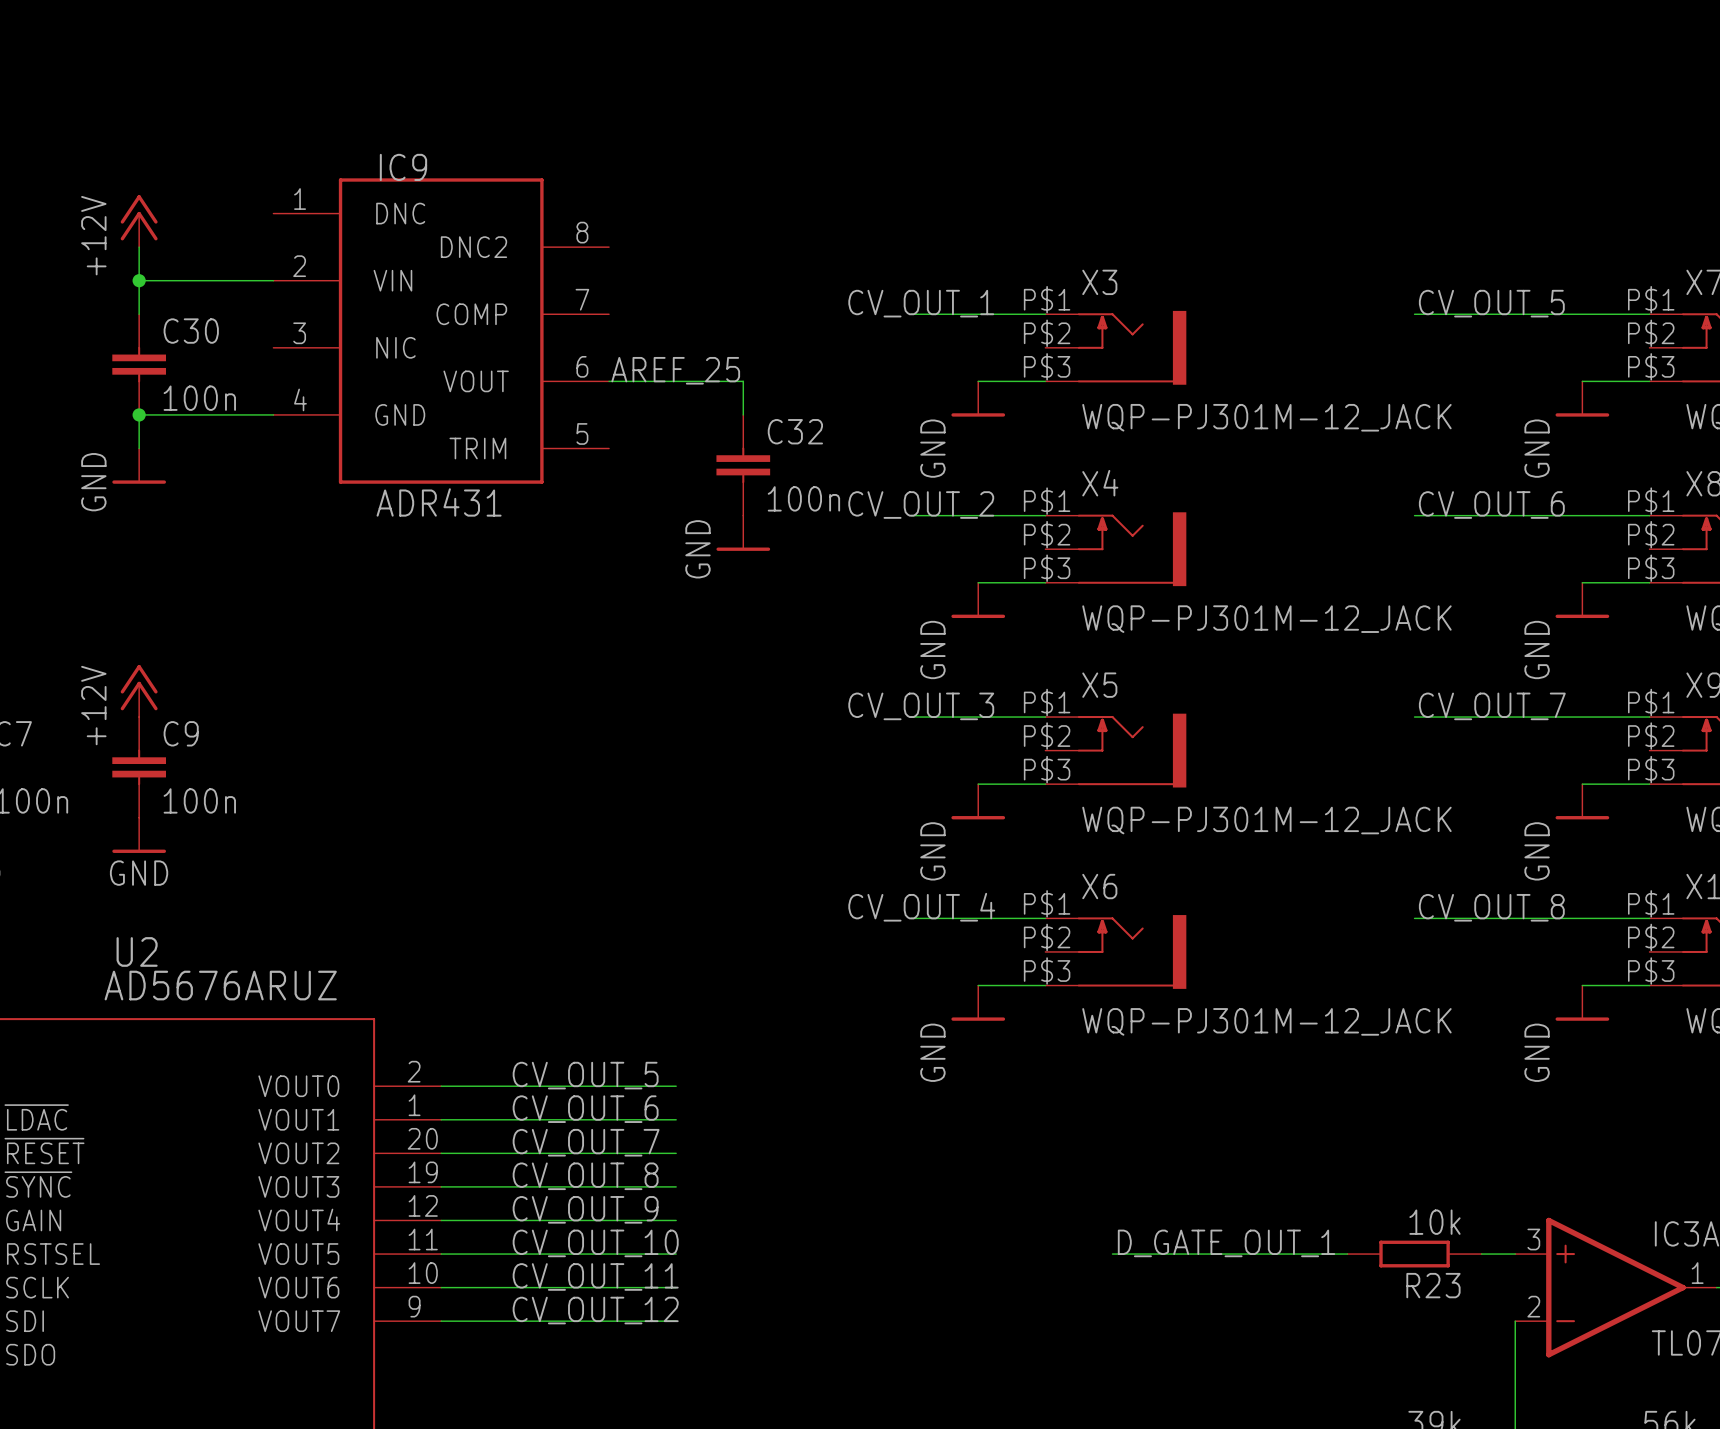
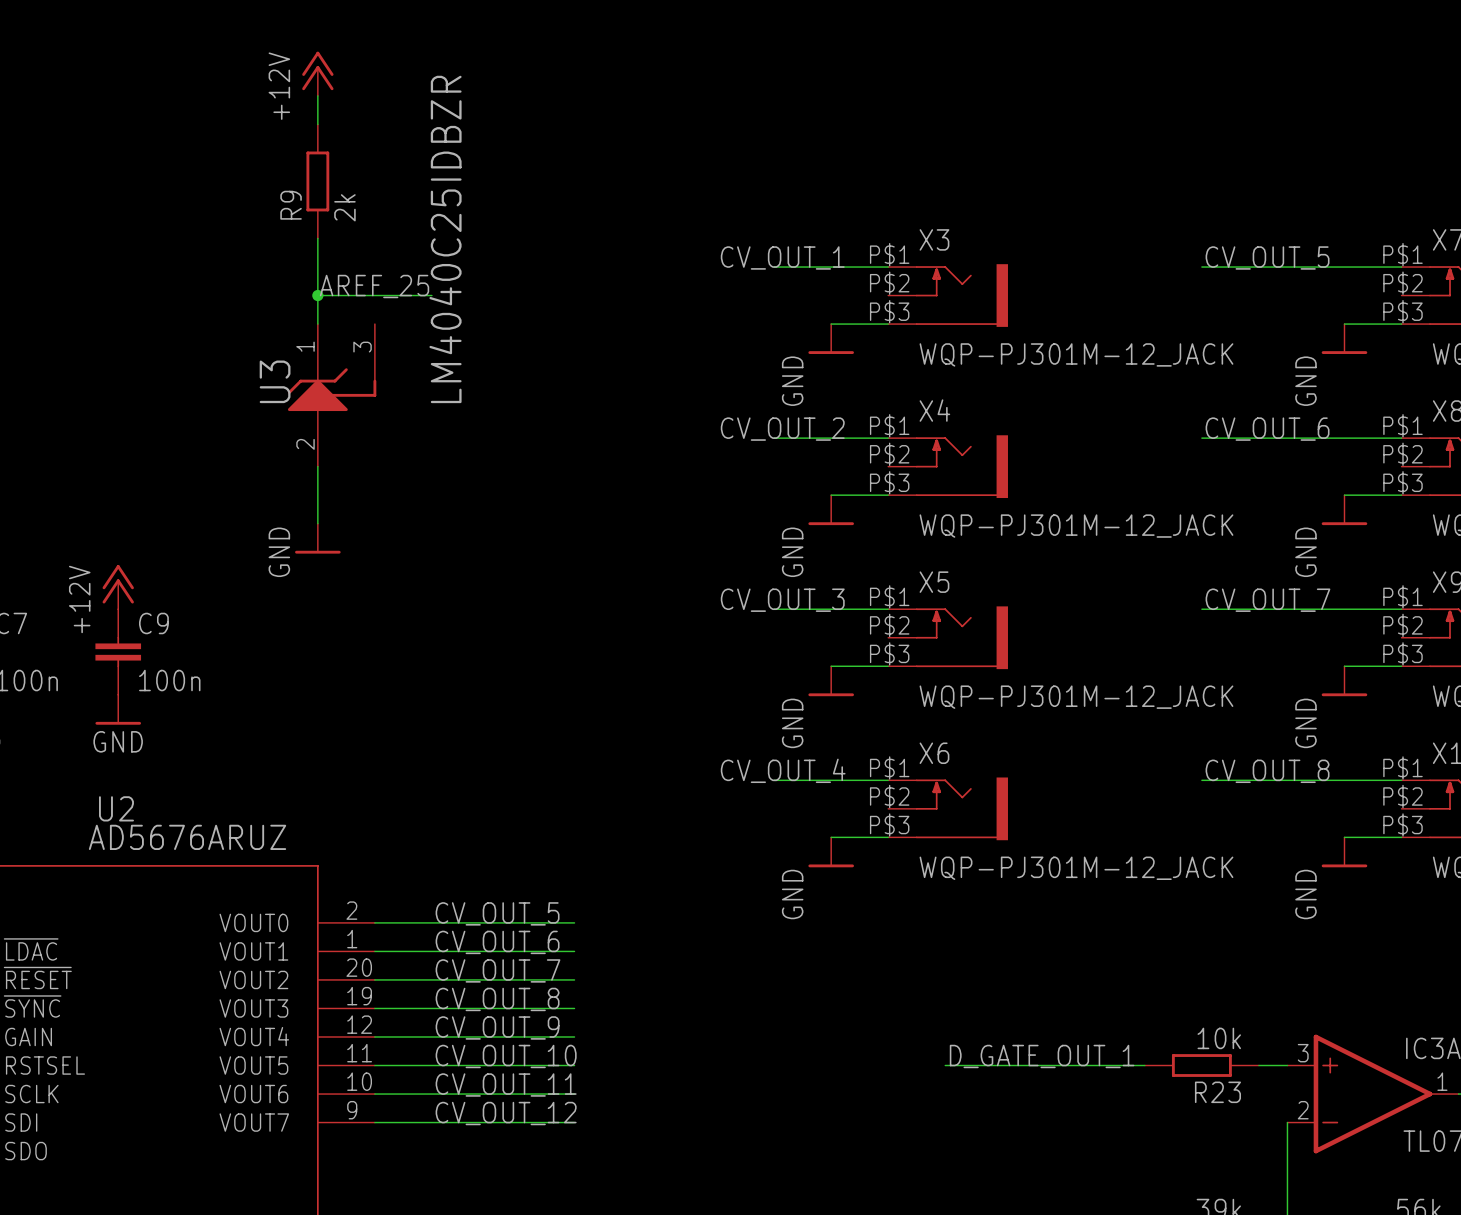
wire: none -> (317, 95) (317, 124)
R9: none -> 2k (317, 181)
power symbol position: +12V (139, 221) -> +12V (317, 73)
wire: (139, 247) (139, 314) -> none
wire: (139, 280) (273, 280) -> (317, 295) (431, 295)
junction: (139, 280) -> none
wire: none -> (317, 238) (317, 324)
IC9: ADR431 (441, 331) -> none
junction: none -> (317, 295)
C30: 100n (139, 364) -> none
label position: AREF_25 (675, 370) -> AREF_25 (374, 286)
wire: (609, 381) (743, 381) (743, 414) -> none
junction: (139, 414) -> none
wire: (273, 414) (139, 414) (139, 448) -> none
U3: none -> (332, 395)
C32: 100n (743, 465) -> none
power symbol: GND (139, 466) -> none
power symbol: GND (743, 533) -> none
wire: none -> (317, 466) (317, 523)
power symbol: none -> GND (317, 538)

